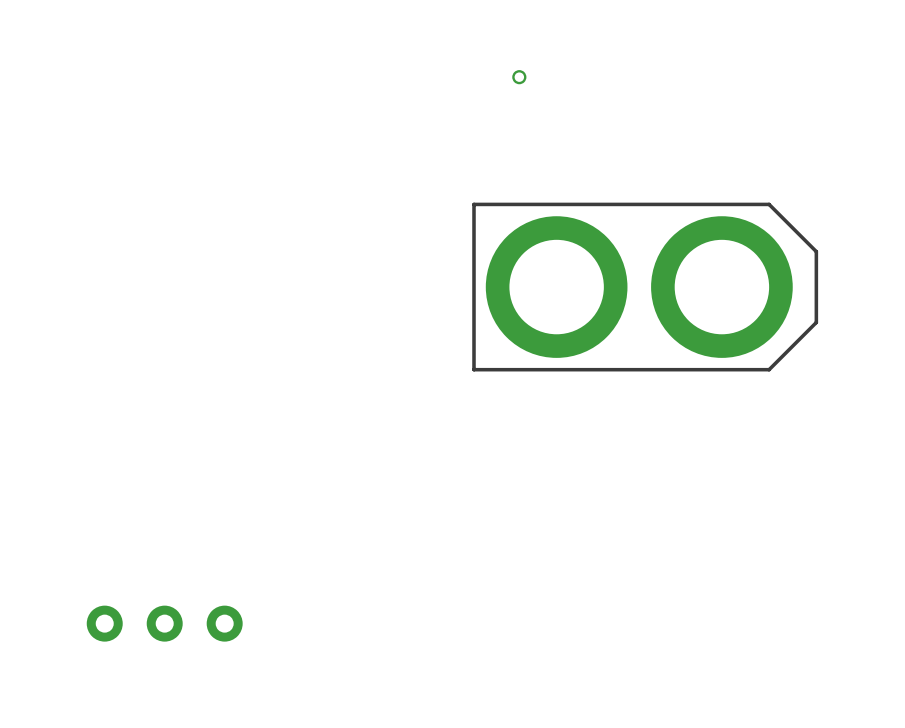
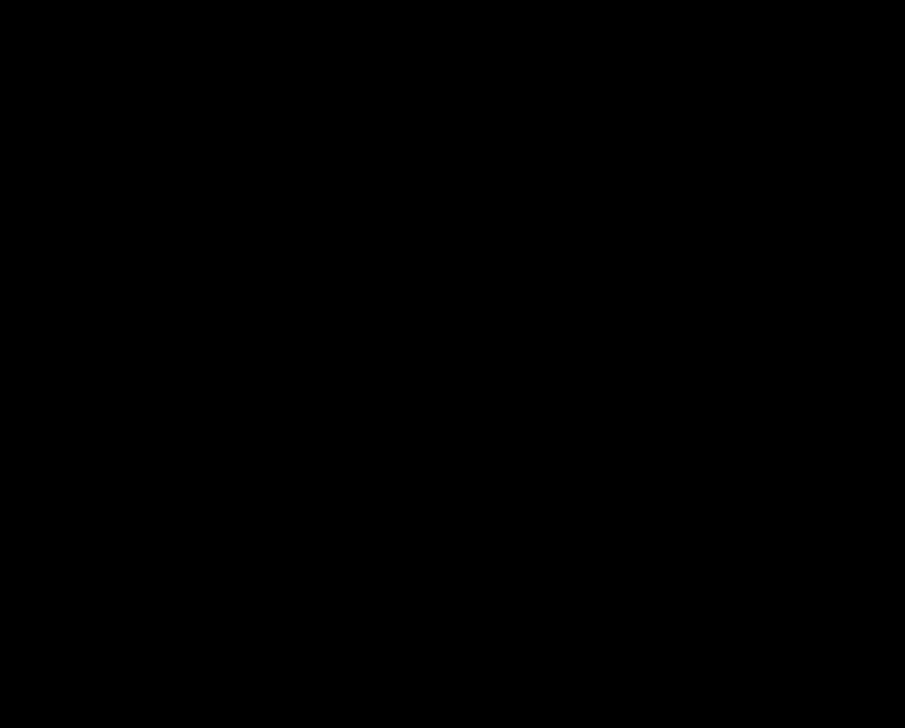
via: (519, 77) -> none
part: (645, 287) -> none
part: (164, 623) -> none

